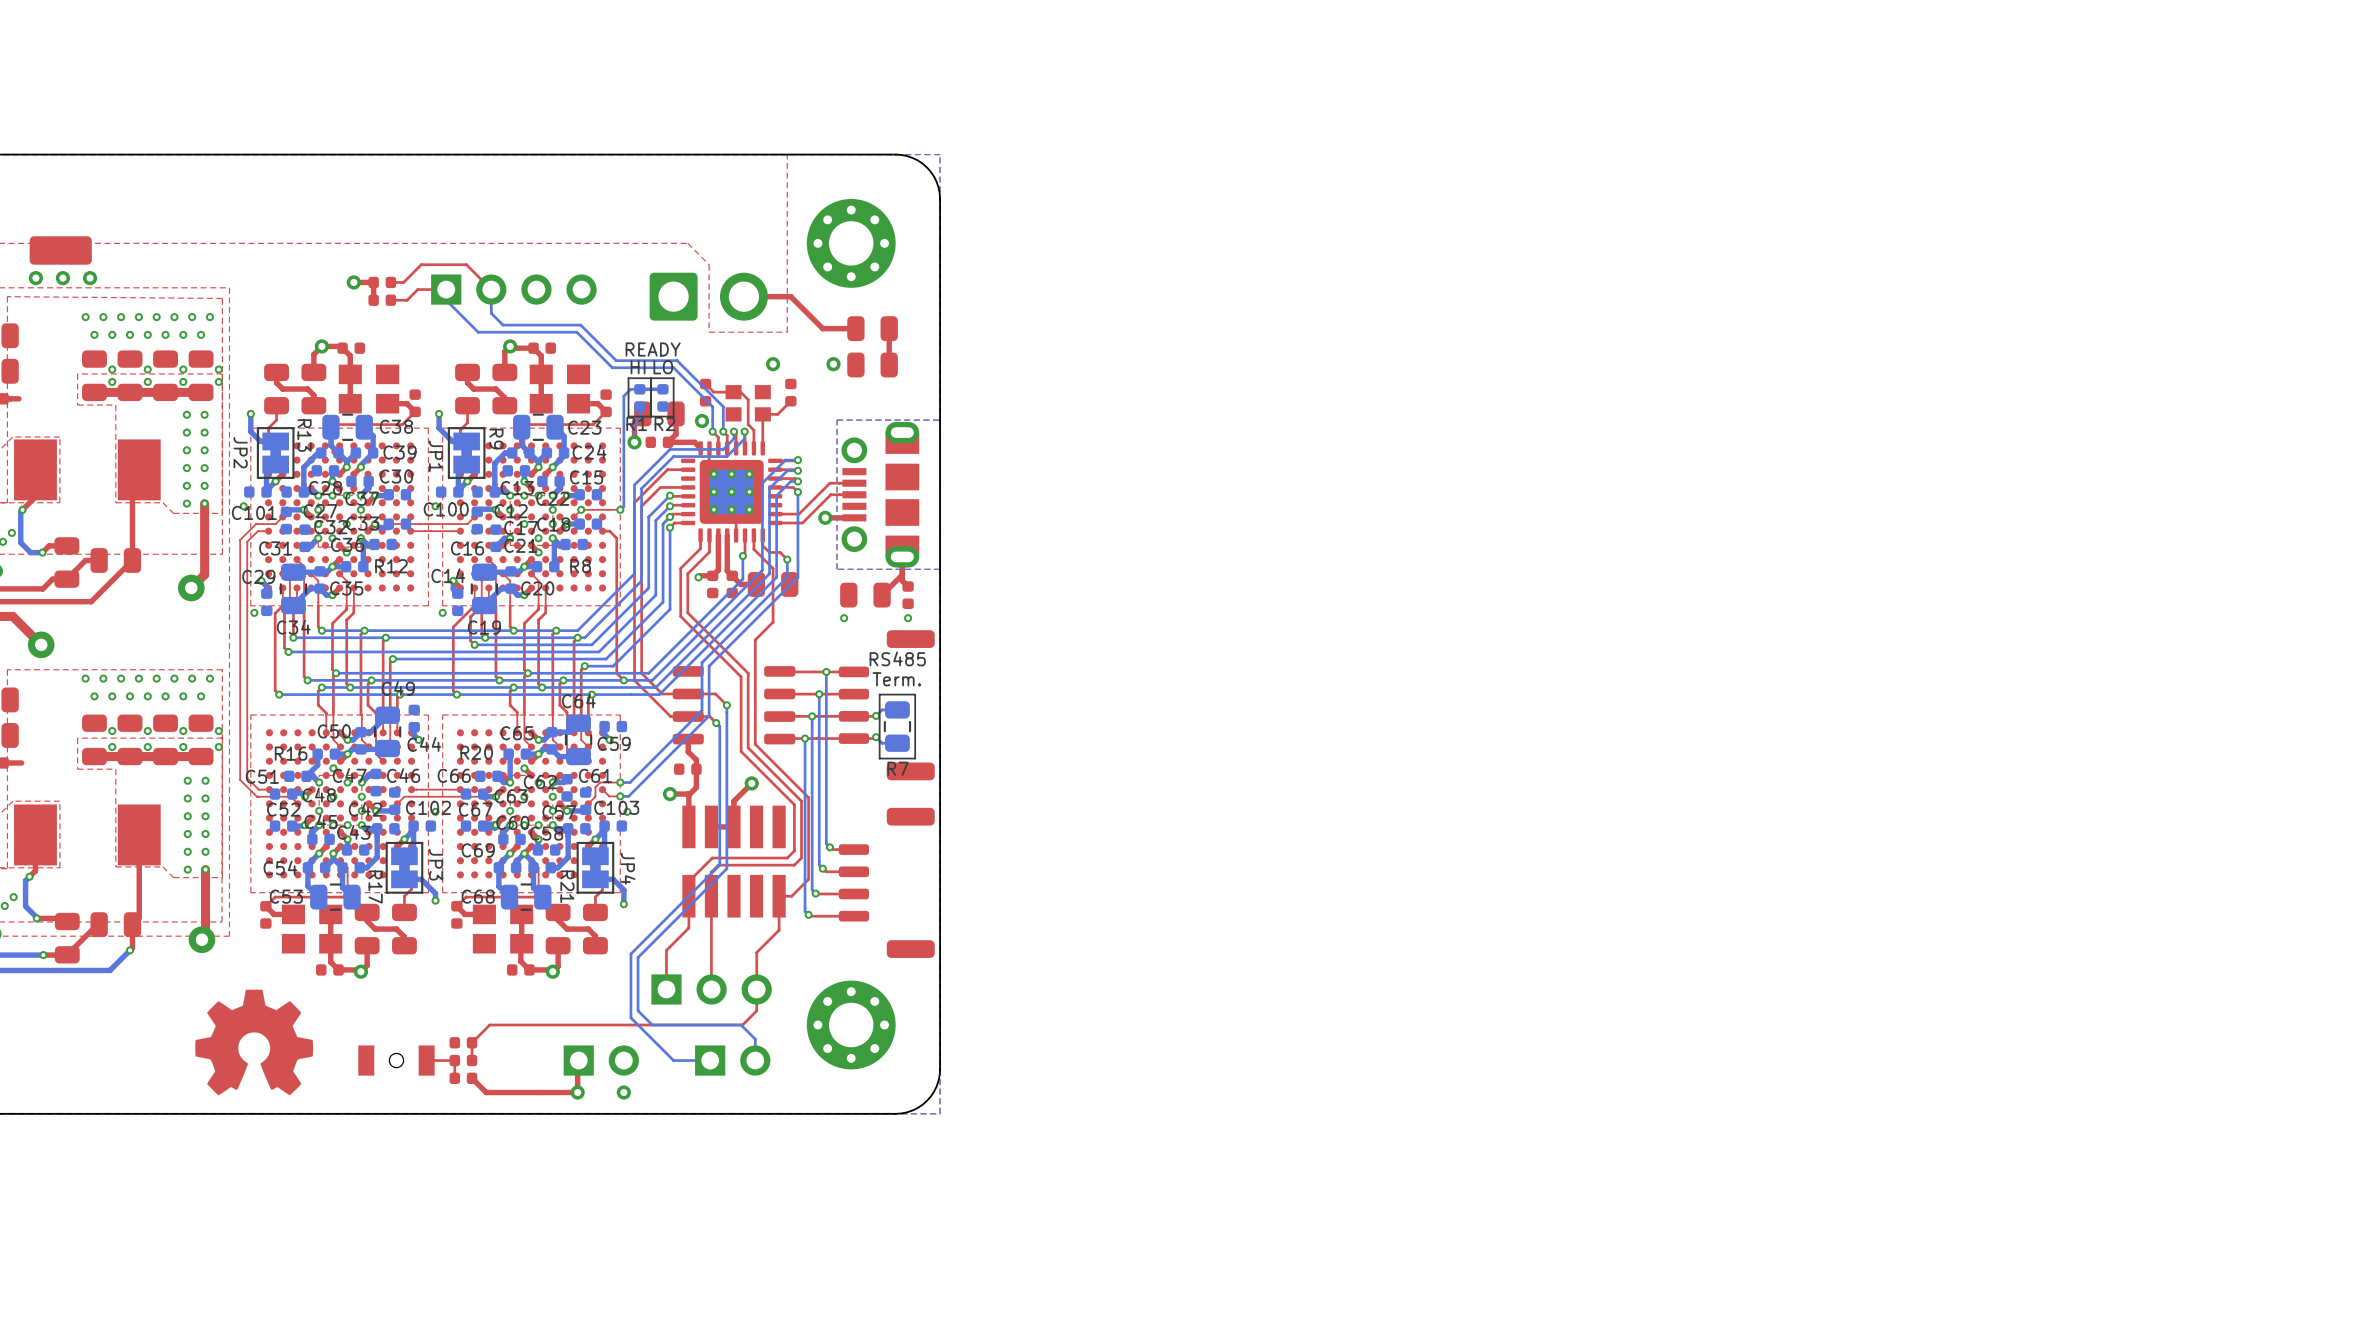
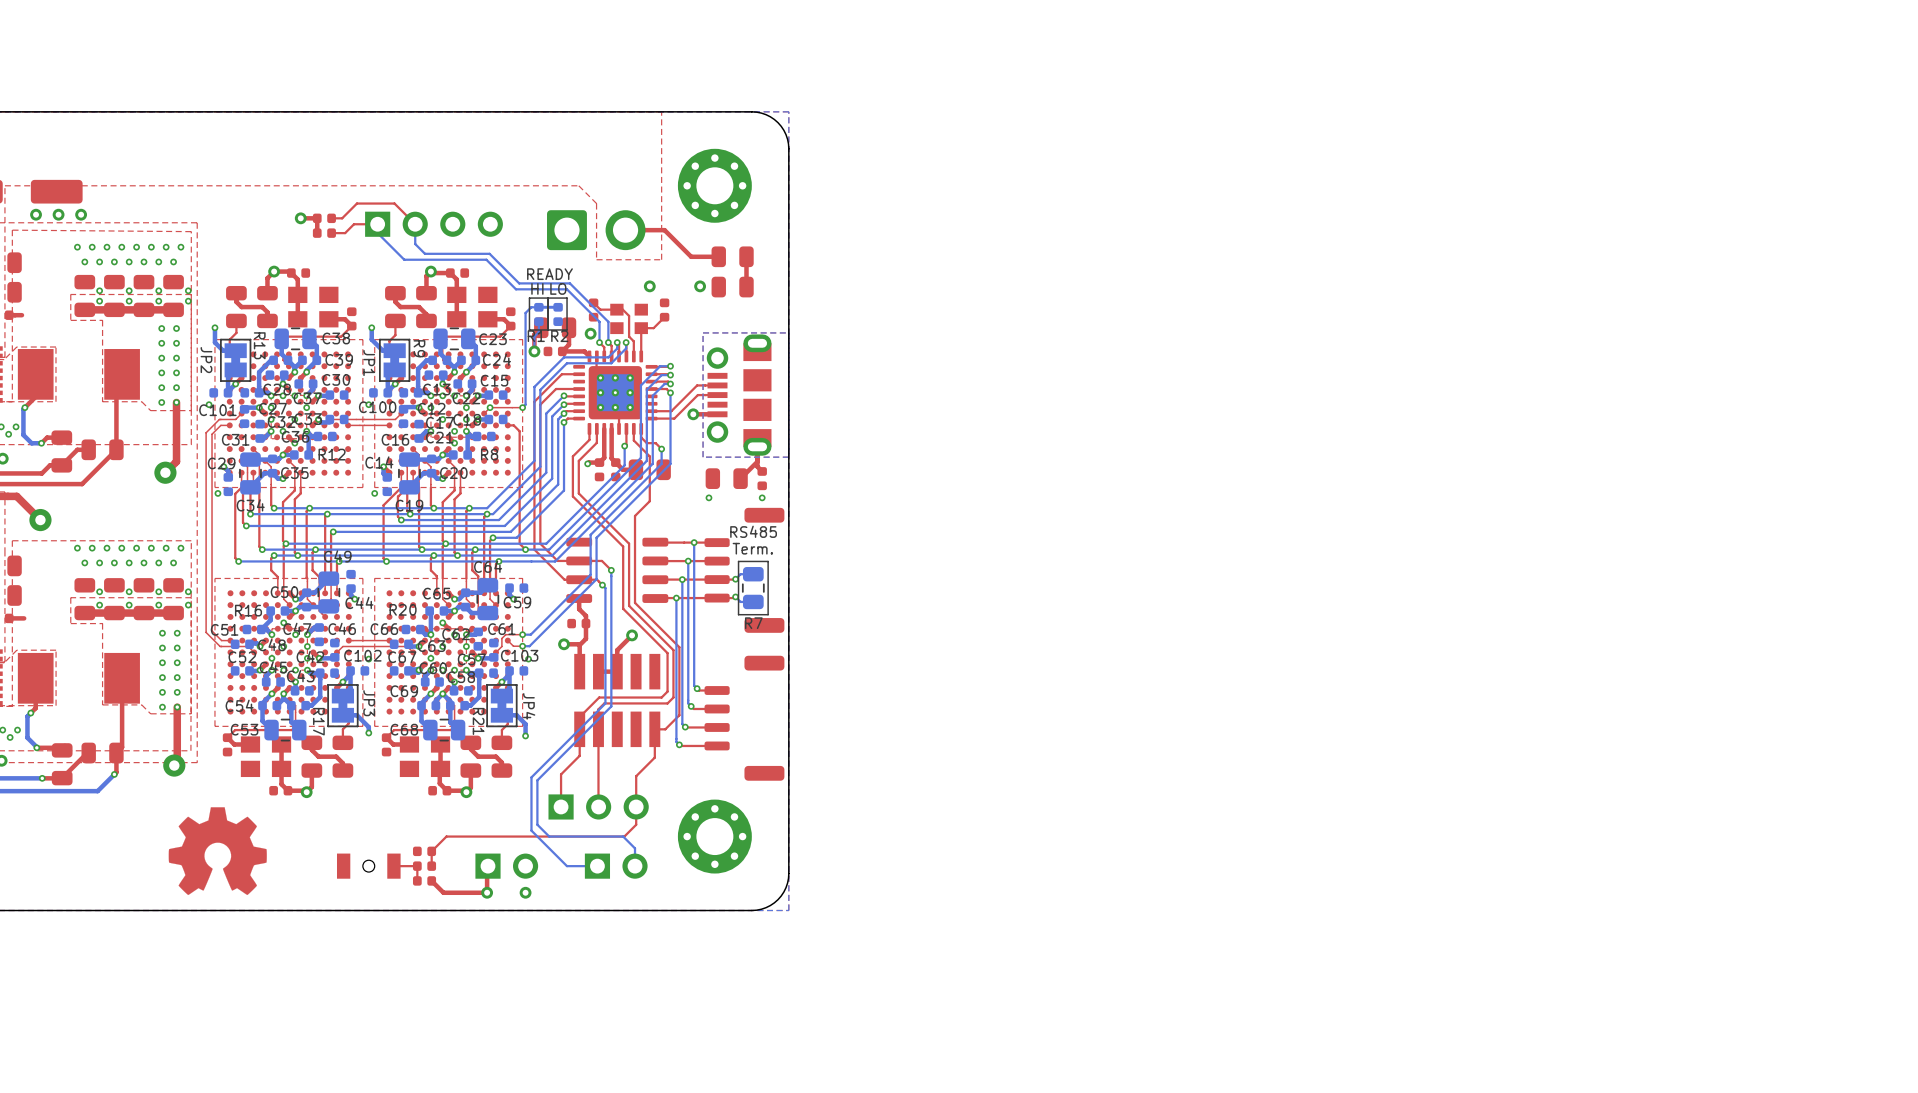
top track: (528, 1025) (489, 1025) (472, 1042) (472, 1060) -> (446, 836) (431, 851) (431, 866)
part: (463, 1042) -> none
part: none -> (424, 851)
part position: (396, 1060) -> (368, 866)
top track: (426, 1060) (454, 1060) (454, 1078) -> (393, 866) (417, 866) (417, 880)
part: (463, 1060) -> none
part: none -> (424, 866)
part: (463, 1078) -> none
top track: (472, 1078) (486, 1092) (525, 1092) -> (431, 880) (443, 892)
part: none -> (424, 880)

